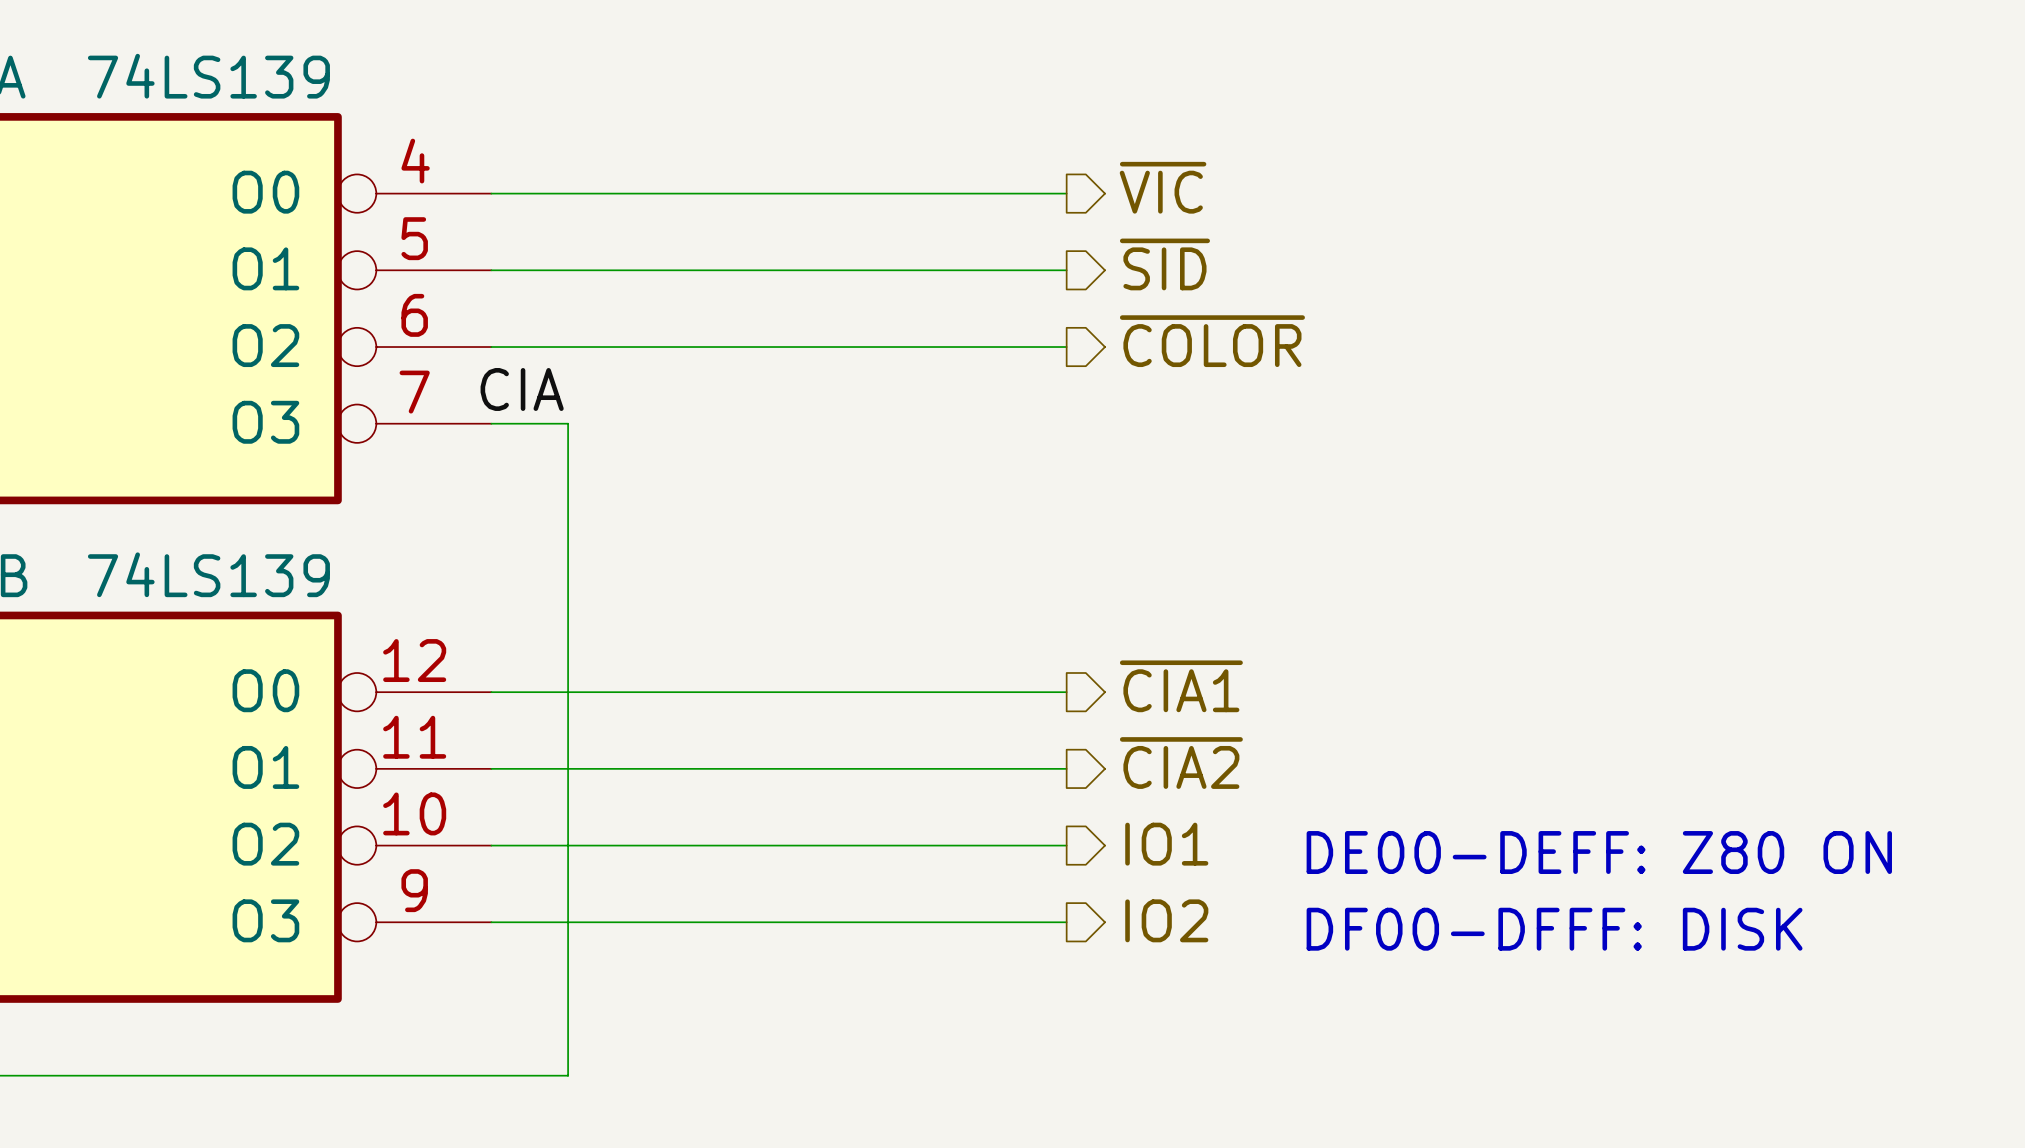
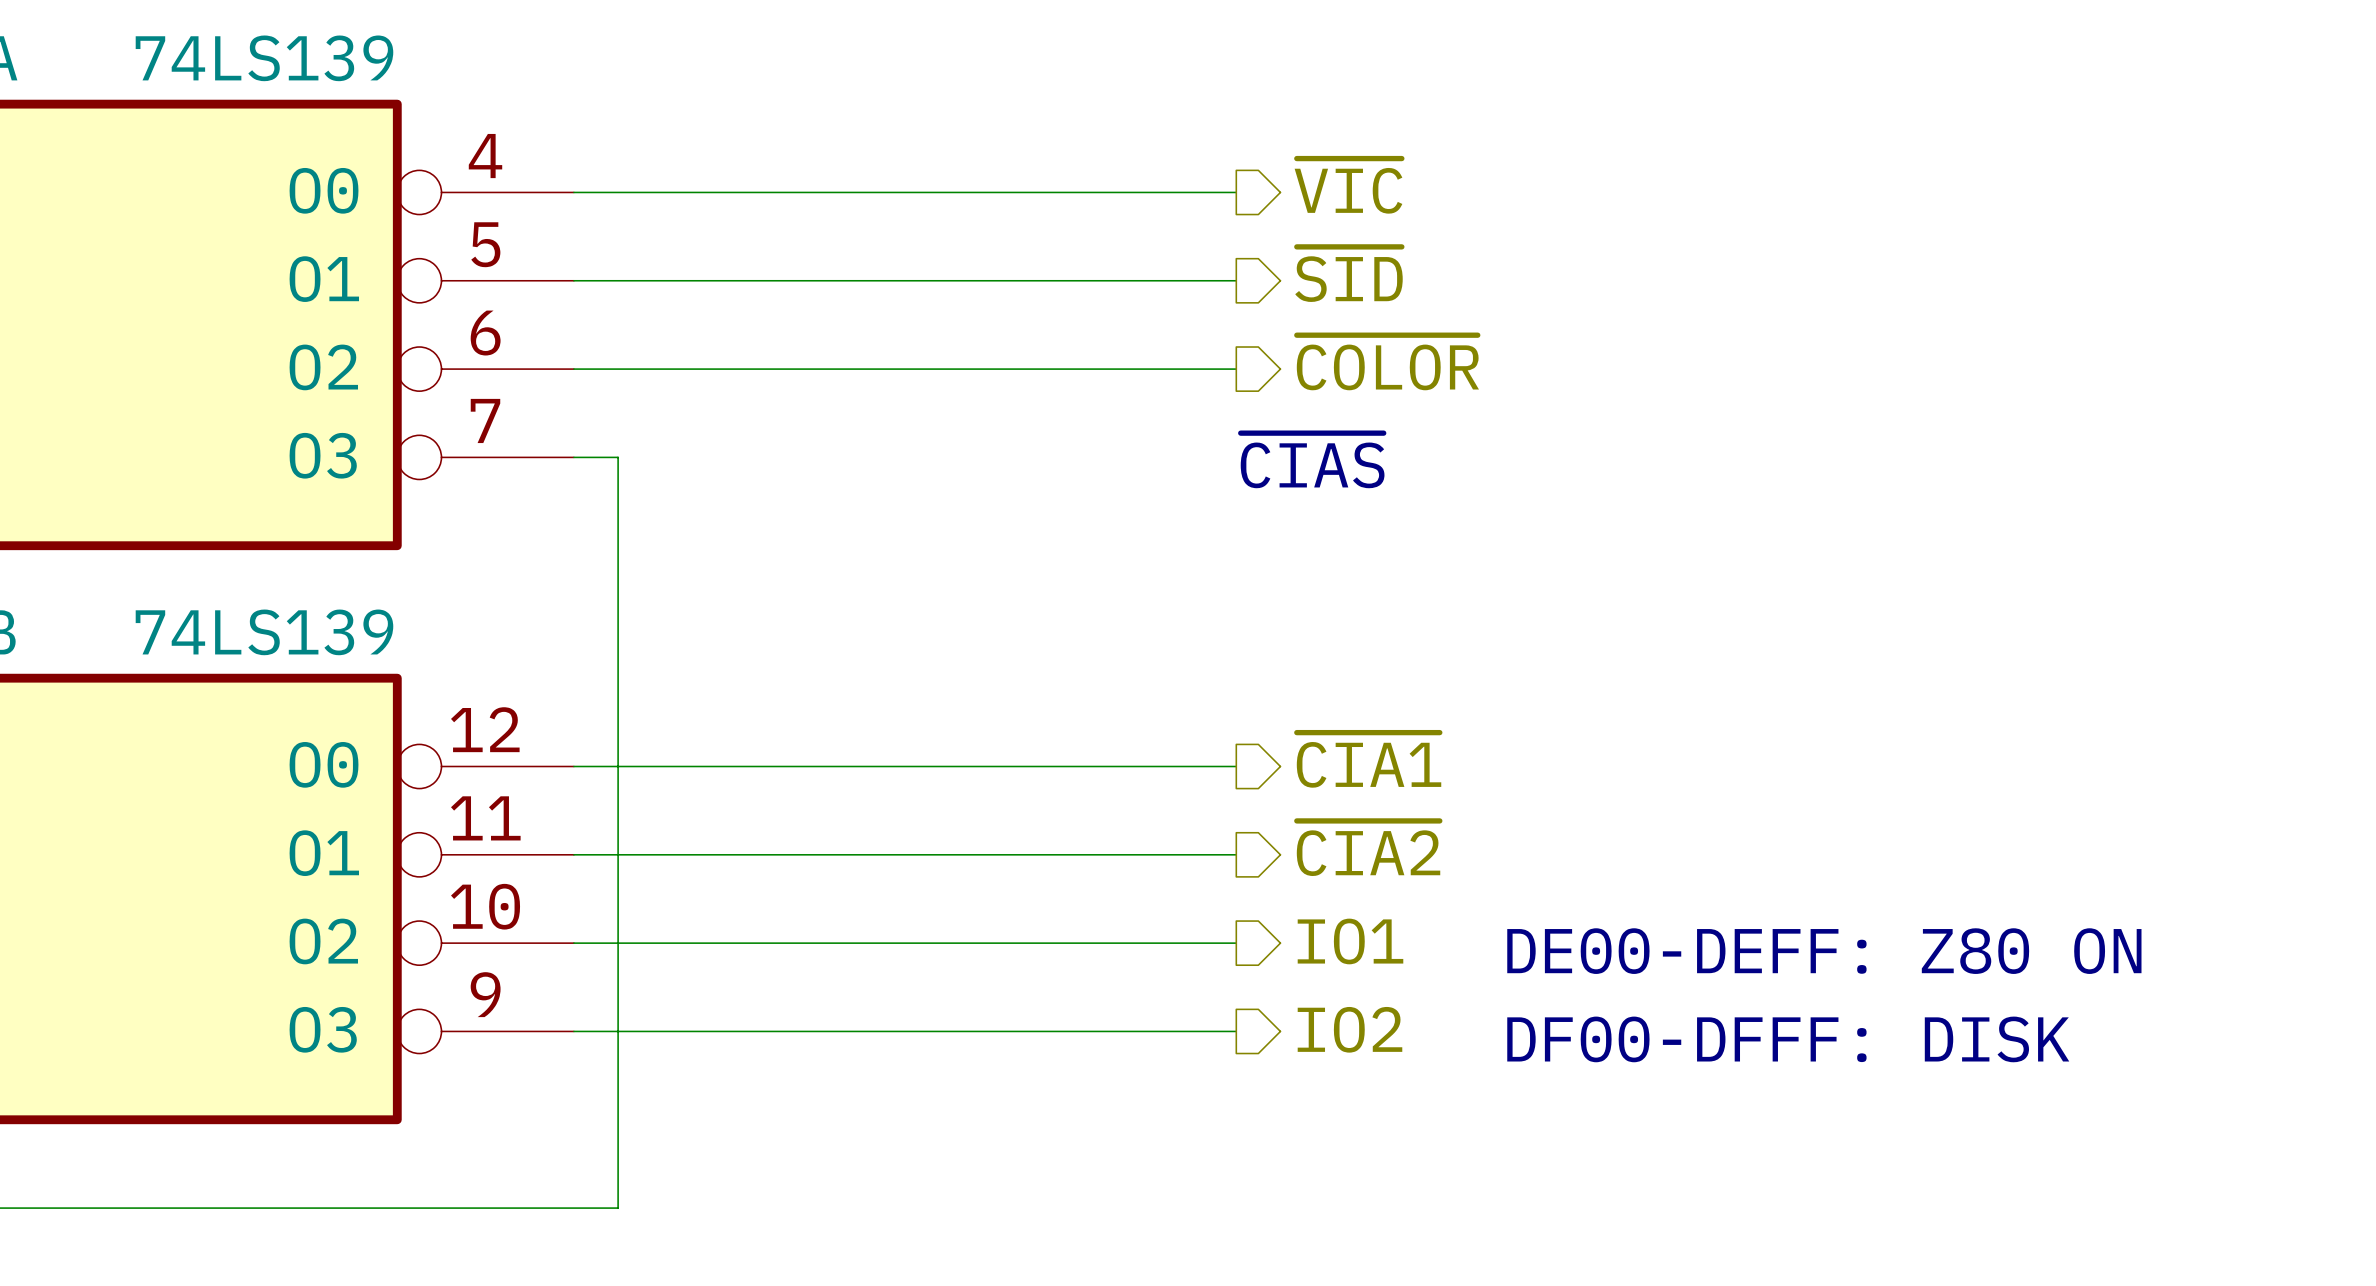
label: CIA (522, 389) -> none
wire: (529, 423) (568, 423) (568, 1075) (529, 1075) -> (618, 457) (618, 1208)
text: none -> ~{CIAS} (1312, 460)

